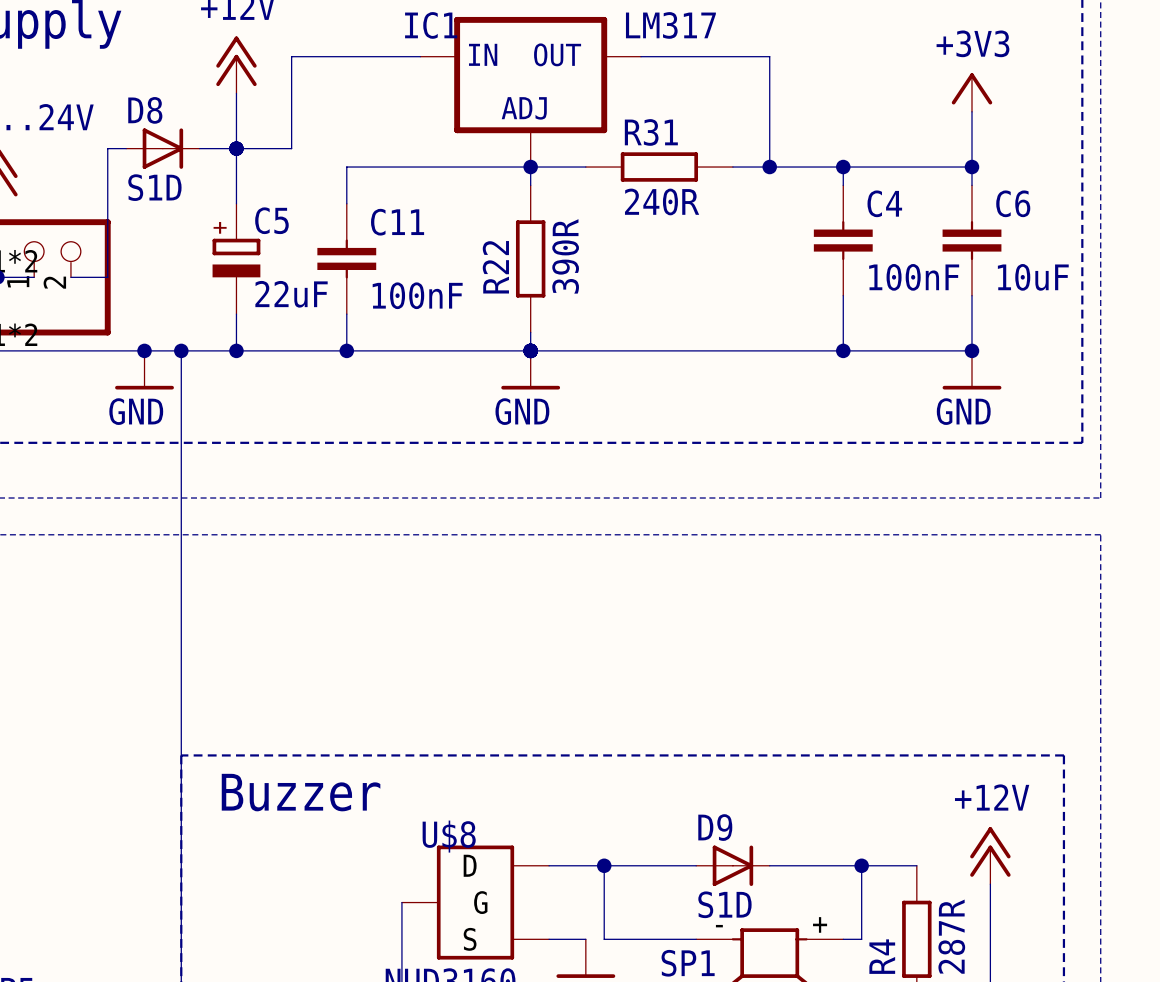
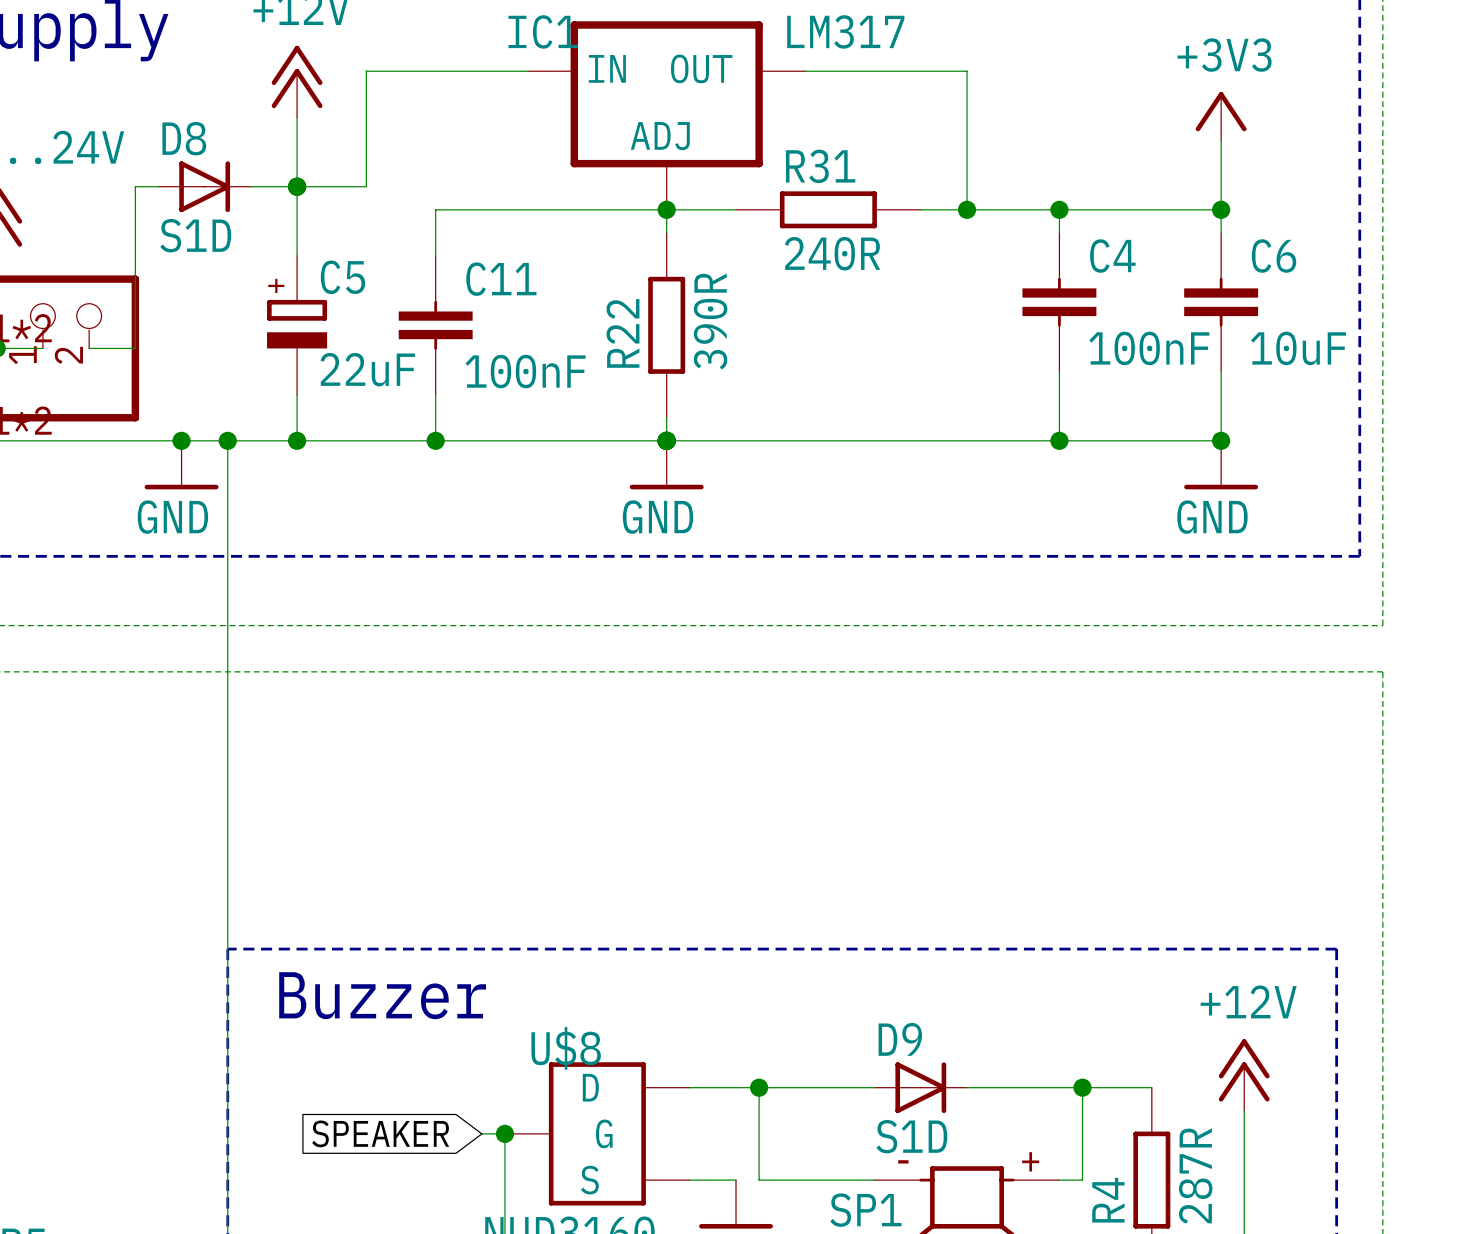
global label: none -> SPEAKER (380, 1133)
wire: none -> (481, 1133) (504, 1133)
junction: none -> (504, 1133)

